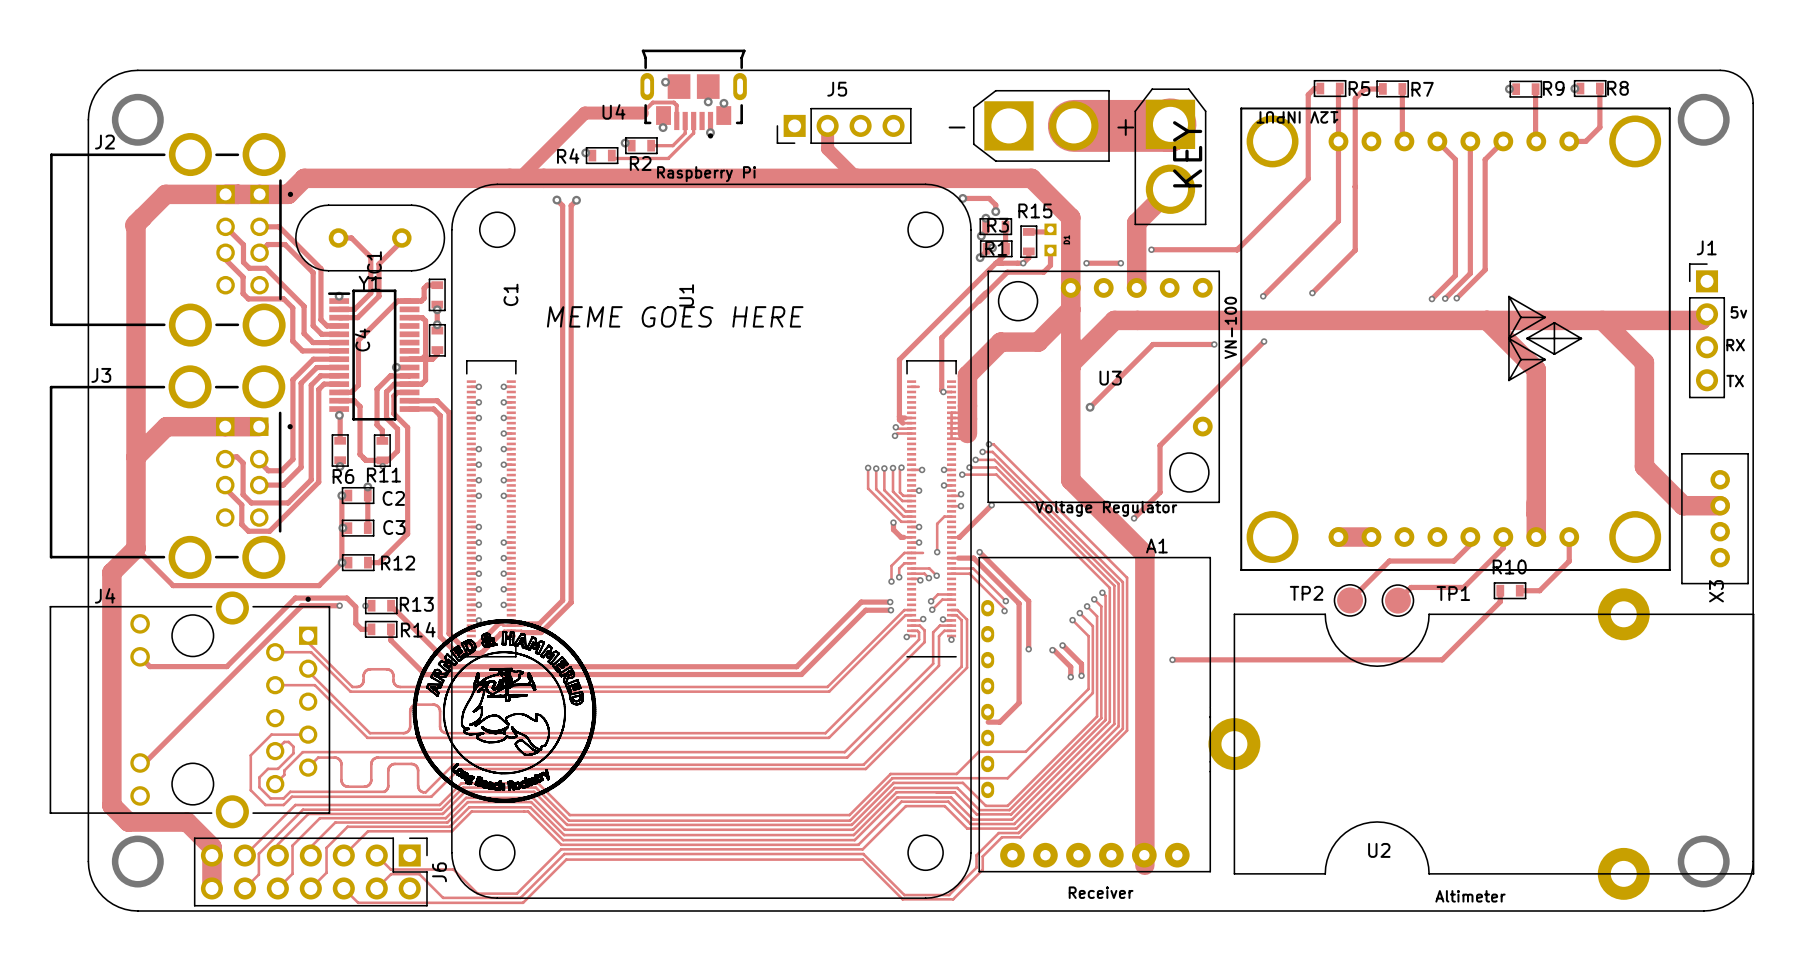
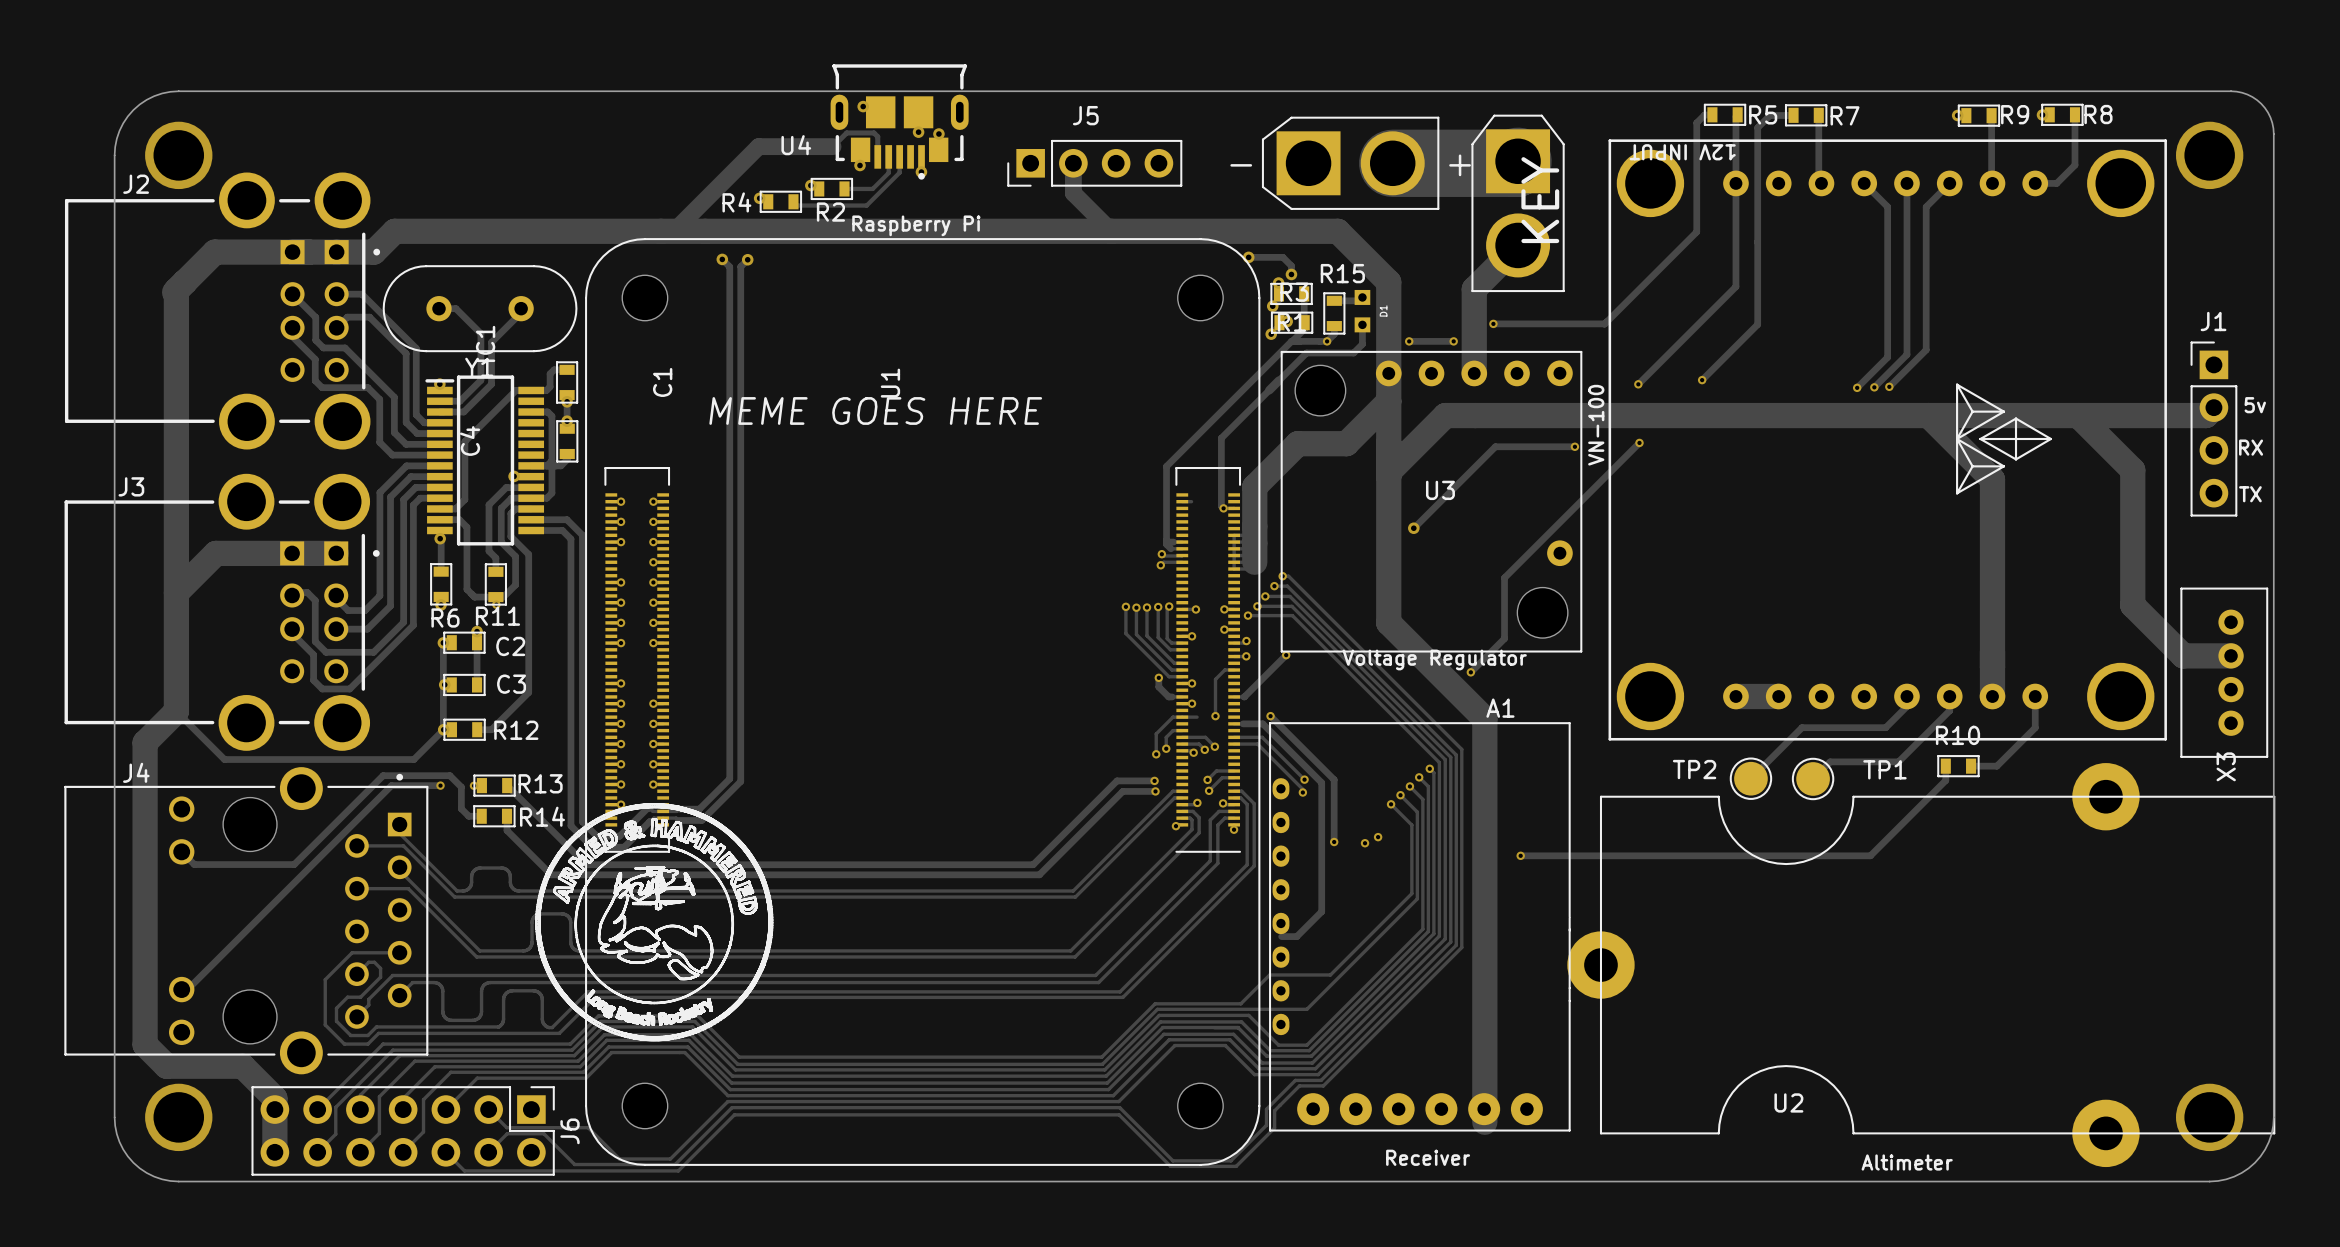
track: (1062, 645) (1081, 664) (1081, 675) -> none
track: (1052, 650) (1070, 666) (1070, 677) -> none
via: (1081, 675) -> none
via: (1070, 677) -> none

